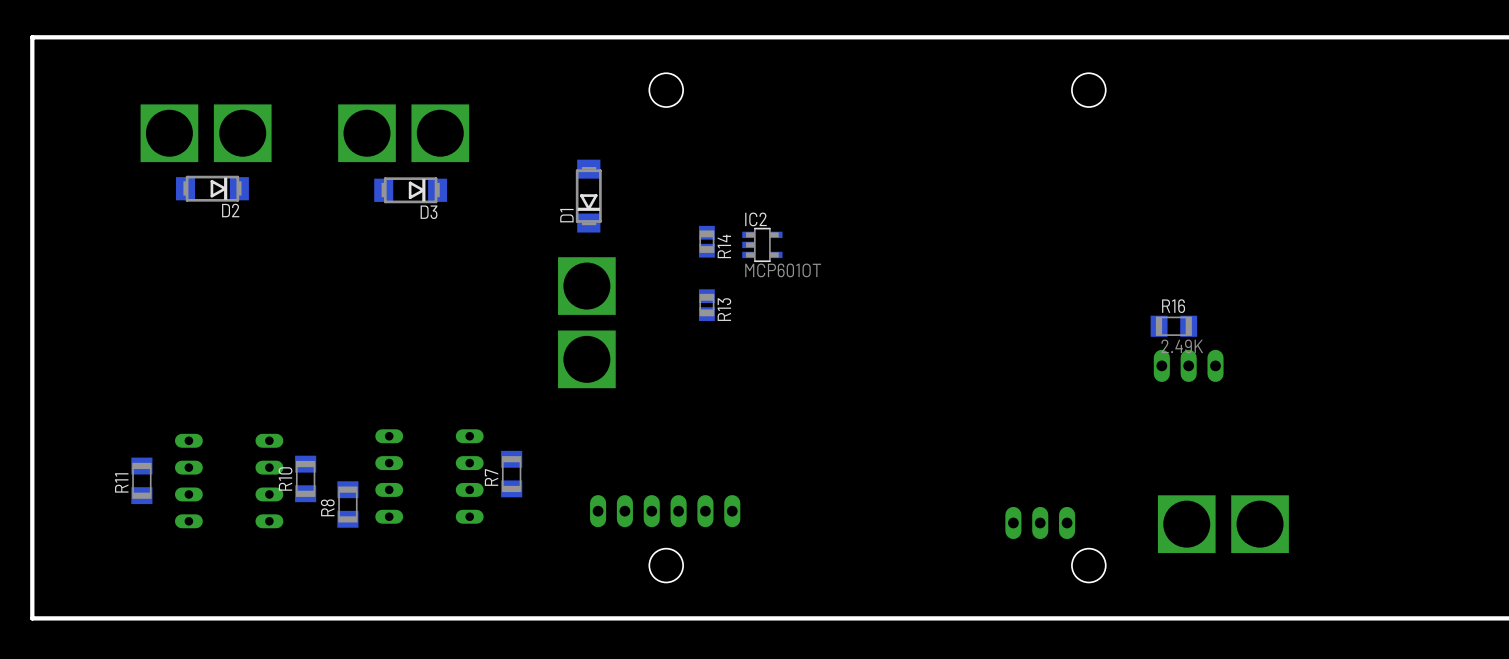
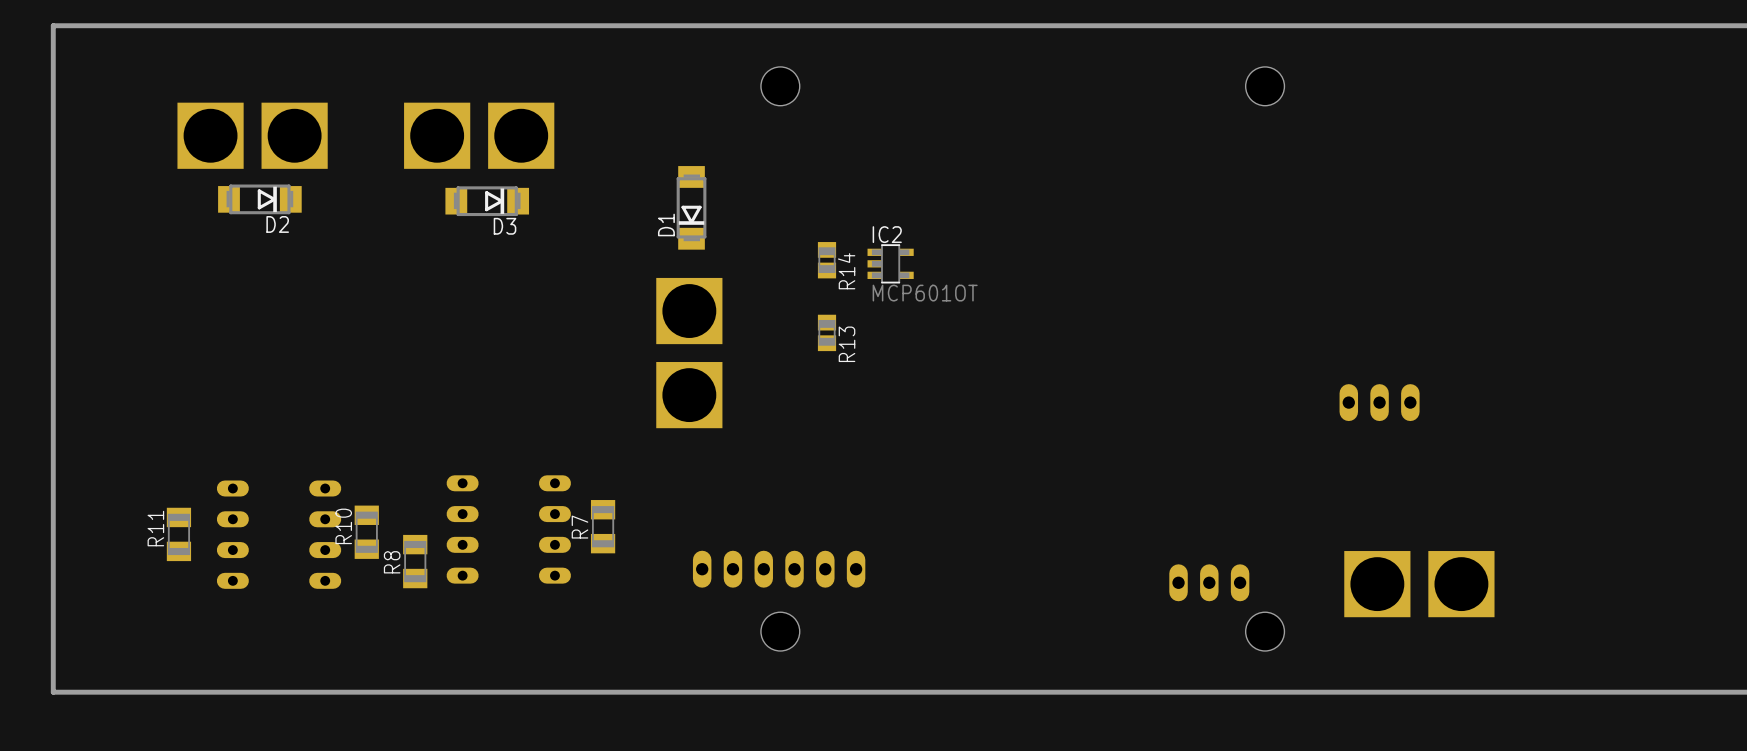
R16: 2.49K (1173, 326) -> none

